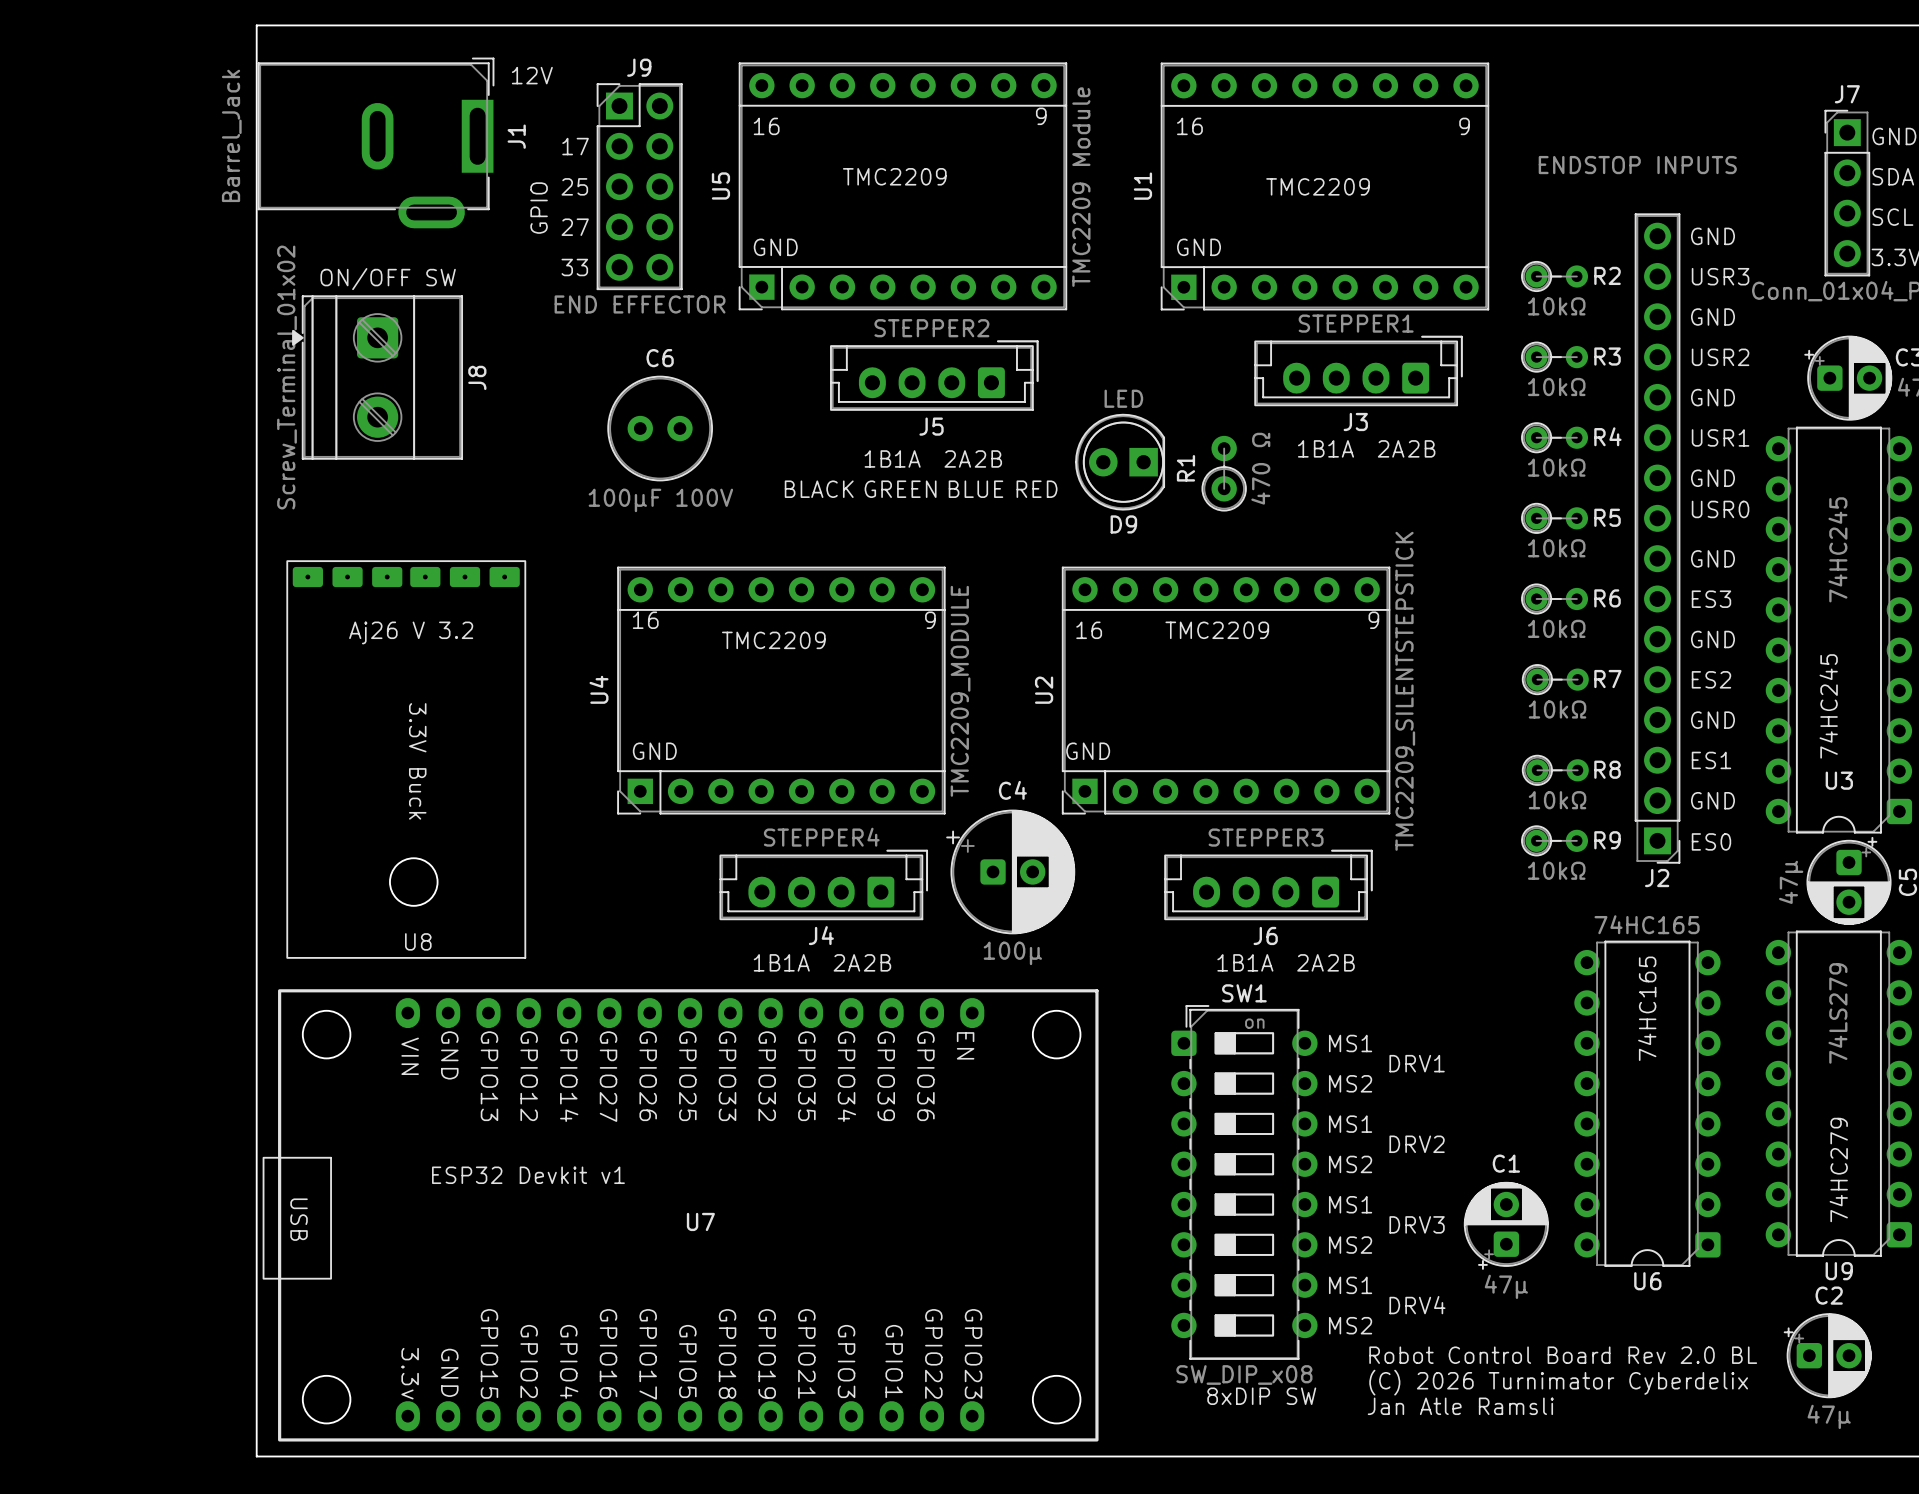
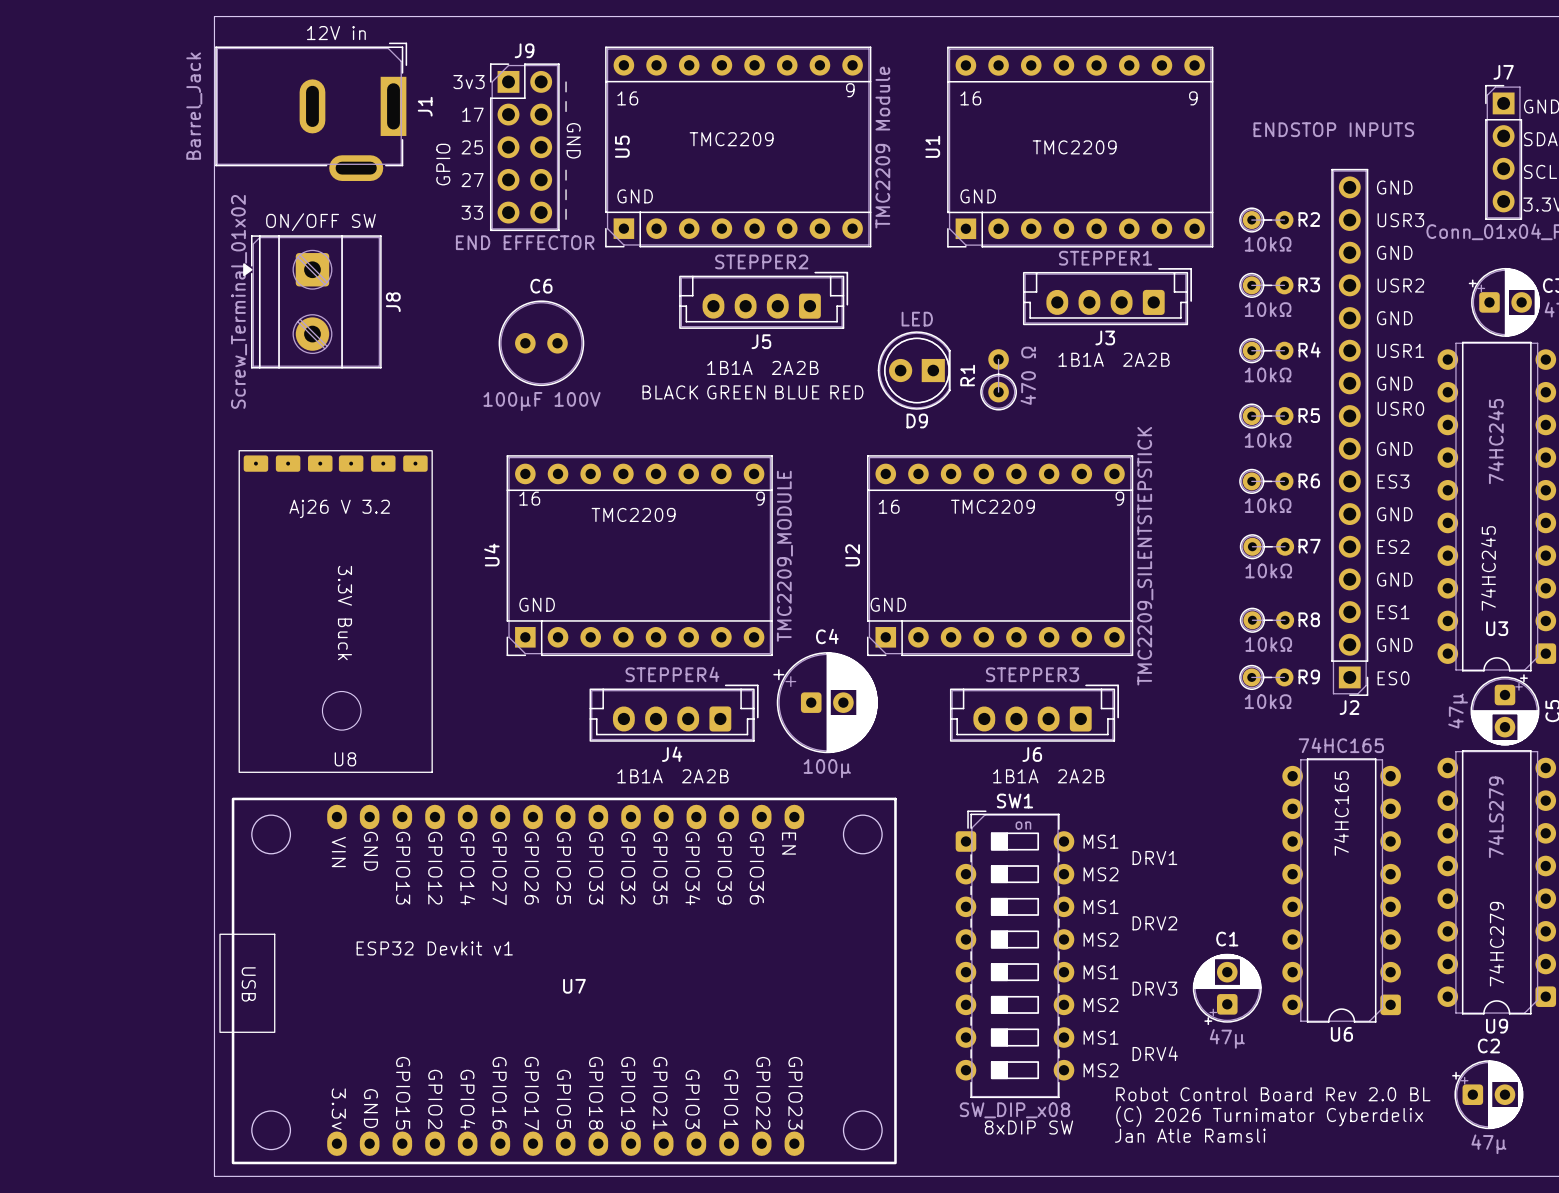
text: none -> 12V in (336, 33)
text: 12V (532, 75) -> none
text: none -> 3v3 (469, 82)
U5 name position: U5 (720, 185) -> U5 (622, 146)
text: none -> _ _ GND _ _ _ (573, 150)

